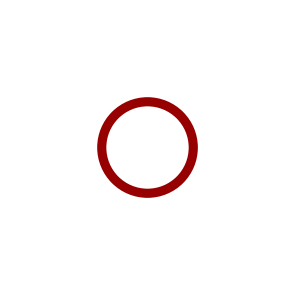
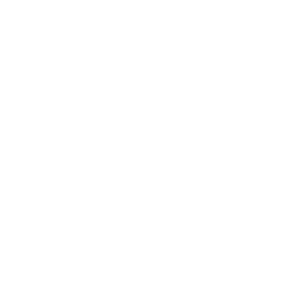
part: (147, 147) -> none

